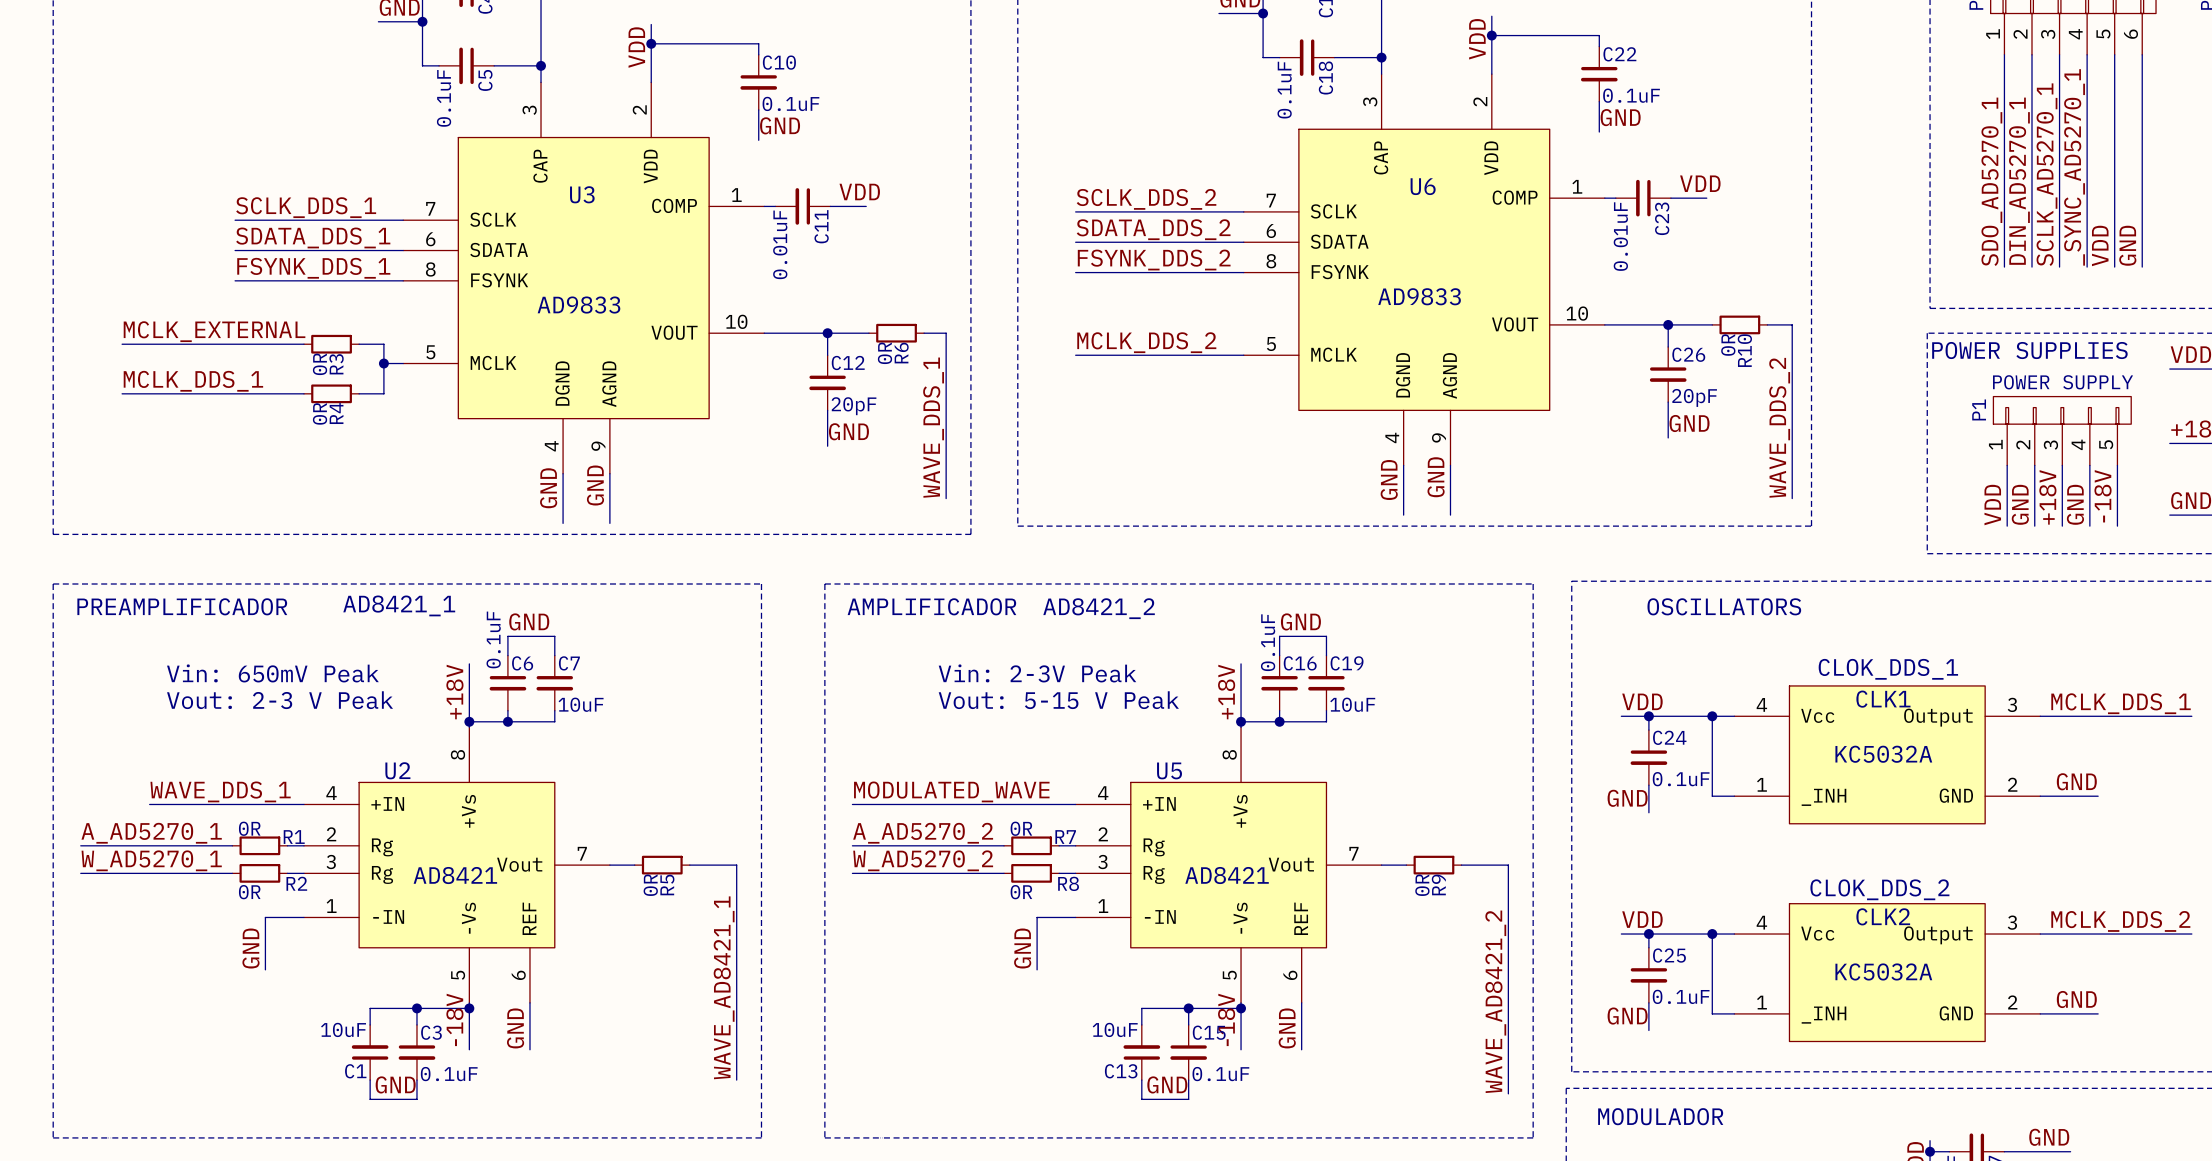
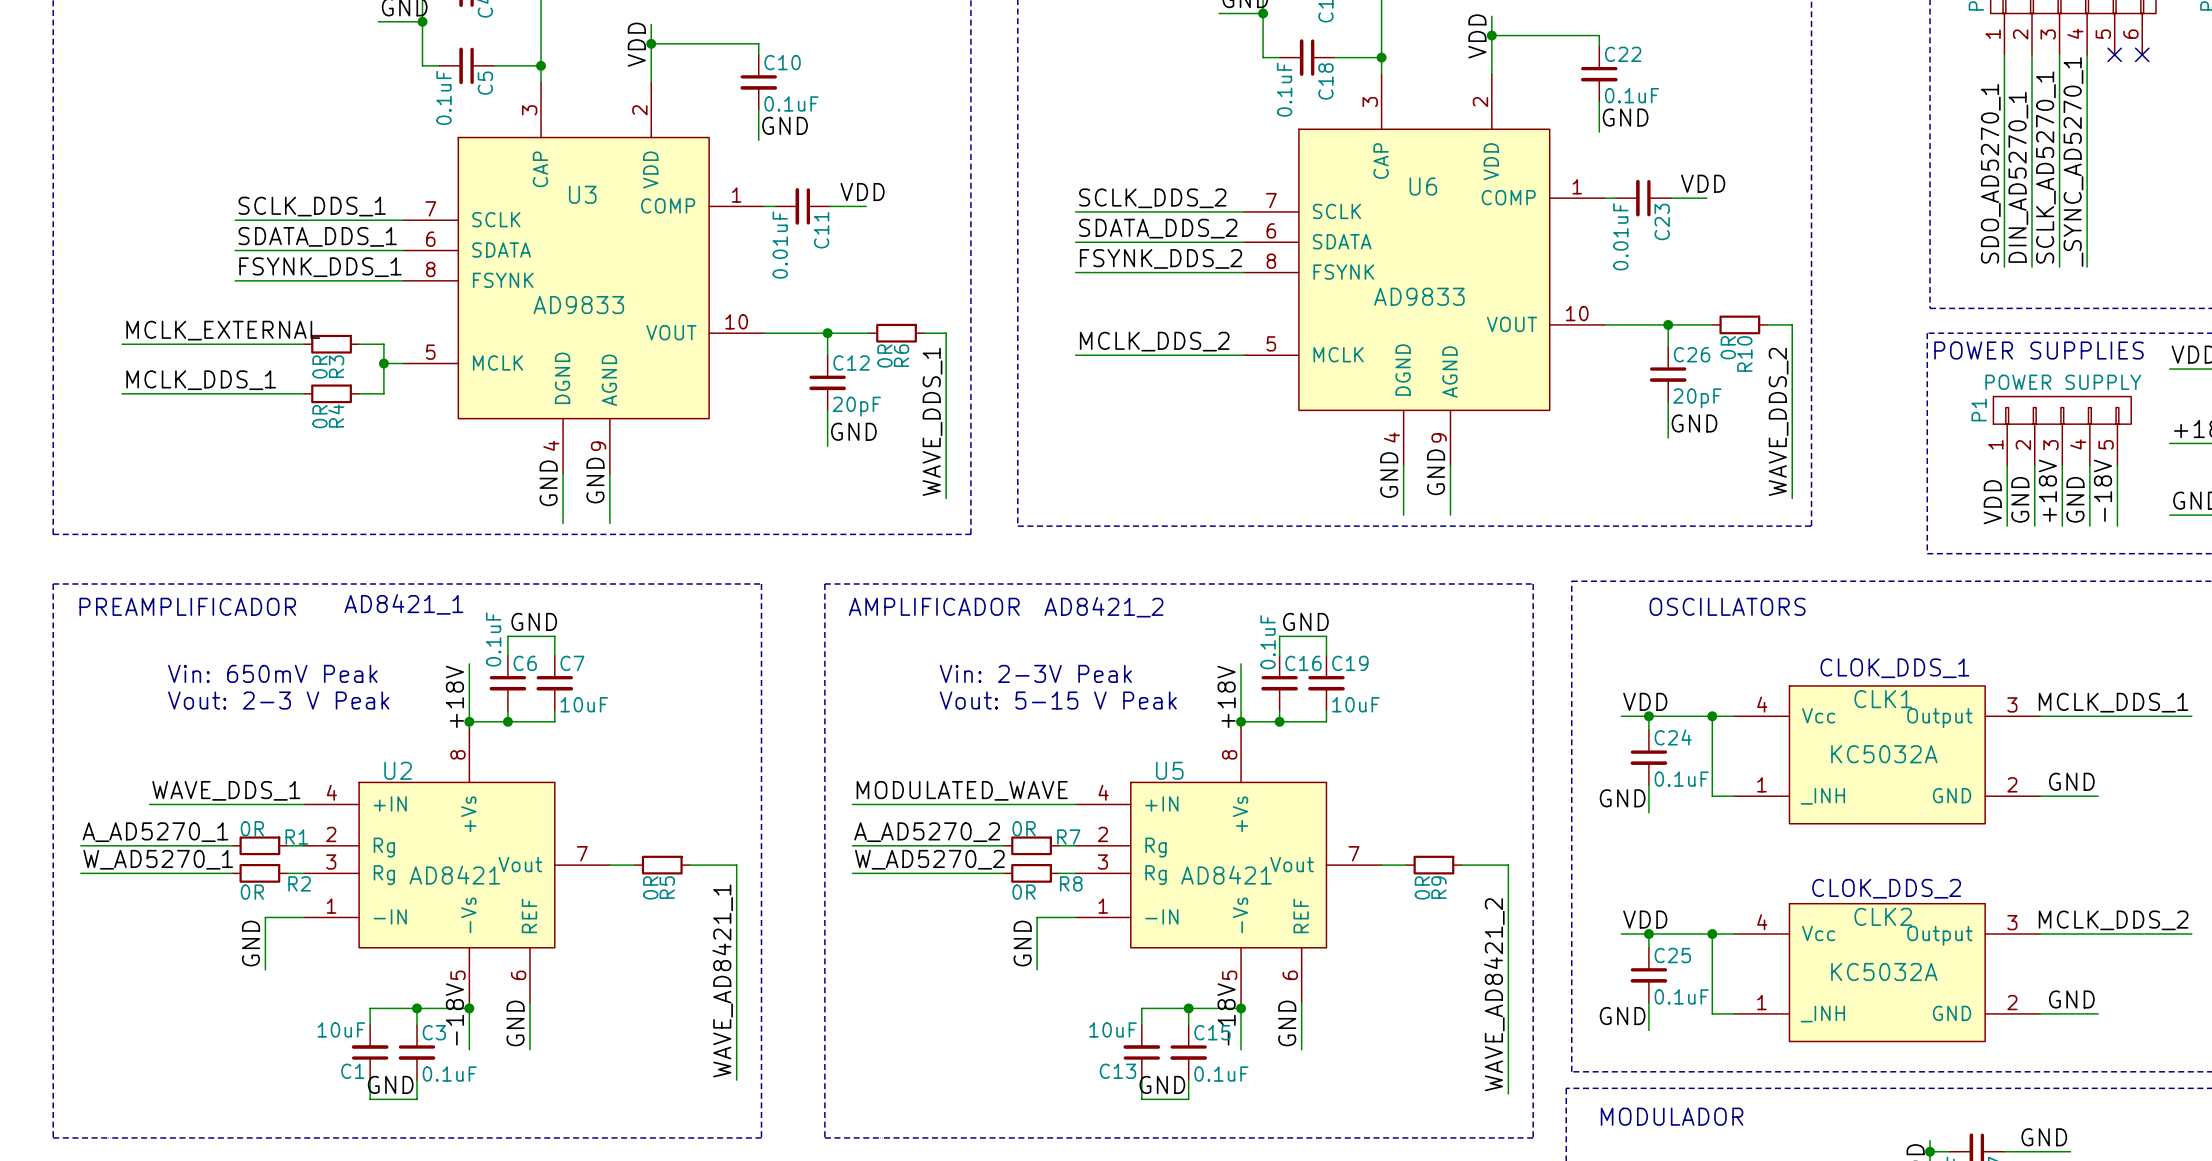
wire: (2114, 54) (2114, 267) -> none
no-connect mark: none -> (2114, 54)
wire: (2142, 54) (2142, 267) -> none
no-connect mark: none -> (2142, 54)
label: VDD (2100, 245) -> none
label: GND (2127, 245) -> none

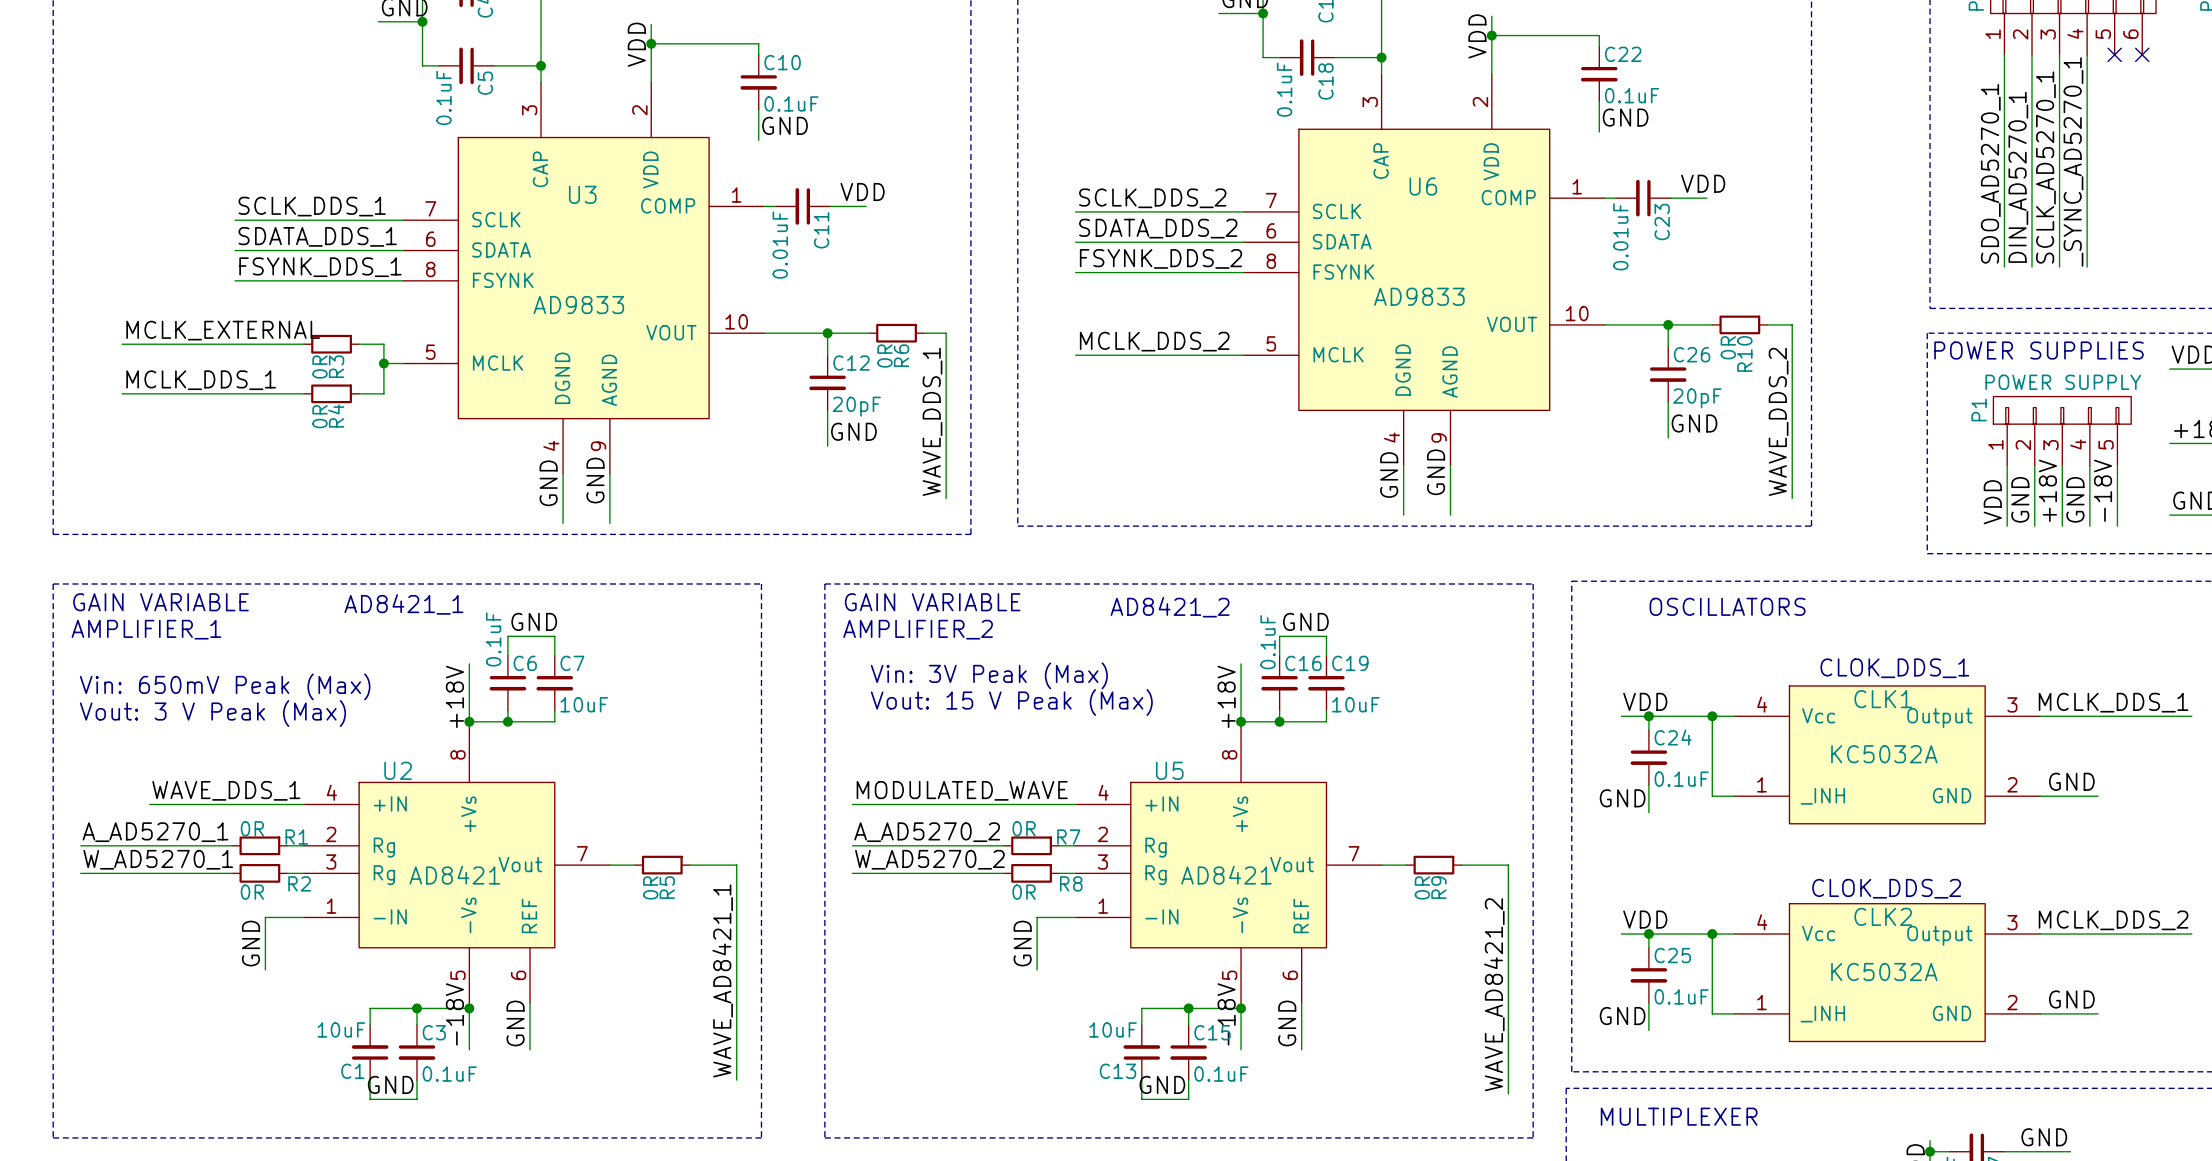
text: PREAMPLIFICADOR (187, 606) -> GAIN VARIABLE (160, 602)
text: AMPLIFICADOR (934, 606) -> GAIN VARIABLE (932, 602)
text position: AD8421_2 (1103, 607) -> AD8421_2 (1170, 607)
text: none -> AMPLIFIER_1 (146, 629)
text: none -> AMPLIFIER_2 (918, 629)
text: Vin: 650mV Peak (272, 673) -> Vin: 650mV Peak (Max) (225, 686)
text: Vin: 2-3V Peak (1035, 673) -> Vin: 3V Peak (Max) (989, 675)
text: Vout: 2-3 V Peak (278, 700) -> Vout: 3 V Peak (Max) (212, 713)
text: Vout: 5-15 V Peak (1058, 700) -> Vout: 15 V Peak (Max) (1011, 702)
text: MODULADOR (1672, 1116) -> MULTIPLEXER (1679, 1116)

